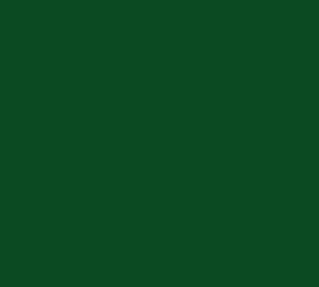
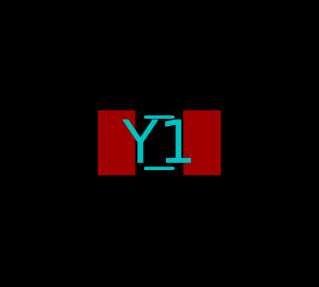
Y1: none -> (159, 142)

